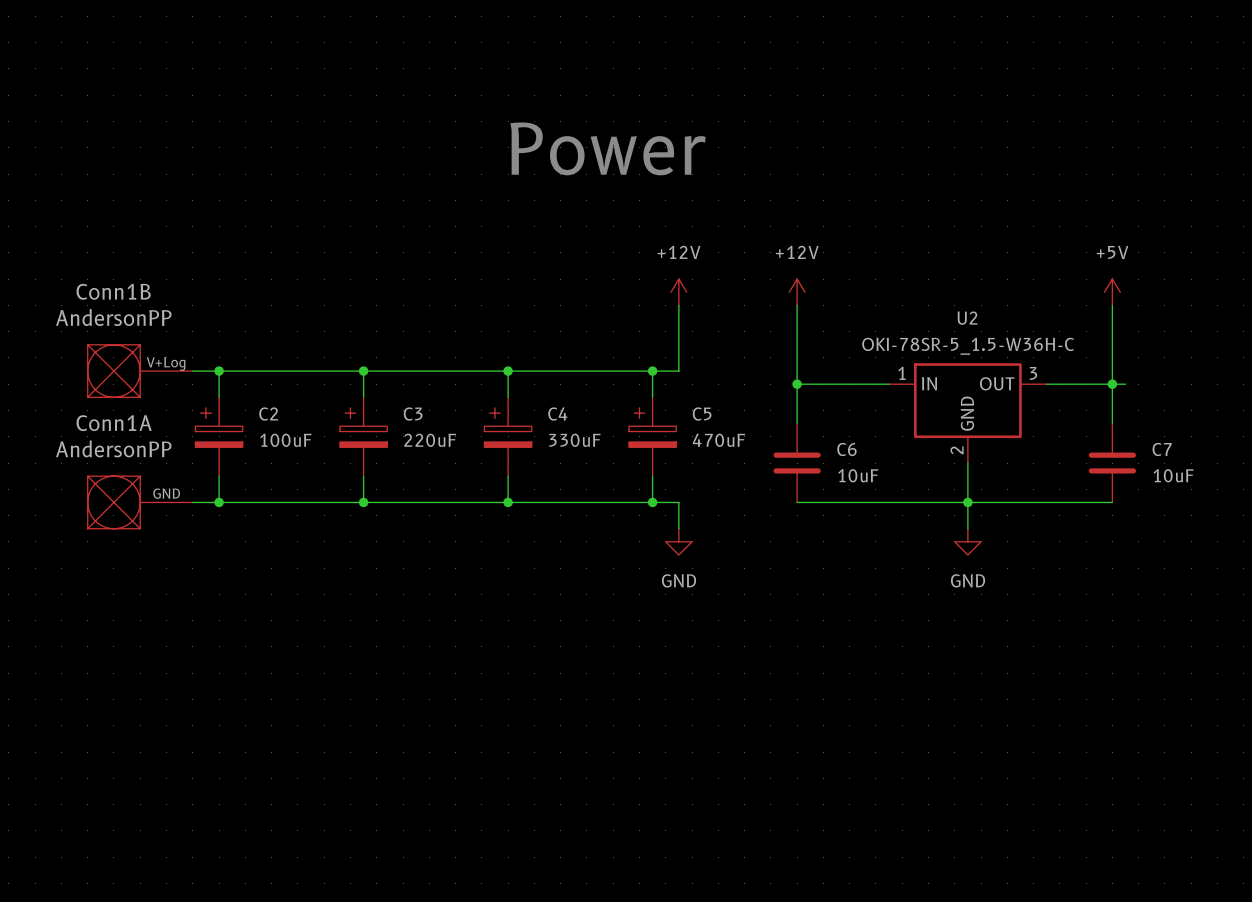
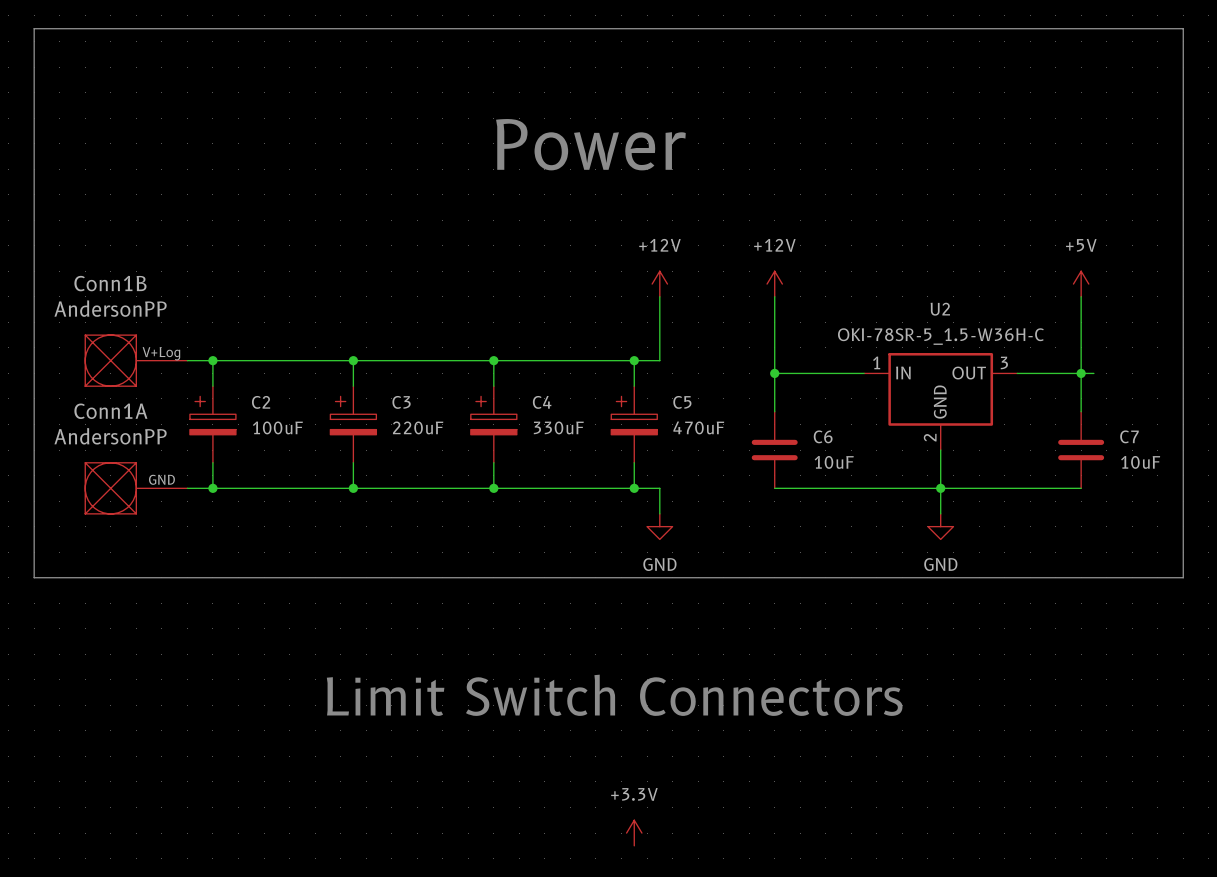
line: none -> (34, 28) (1183, 28) (1183, 577) (34, 577) (34, 28)
text: none -> Limit Switch Connectors (614, 695)
power symbol: none -> +3.3V (634, 833)

